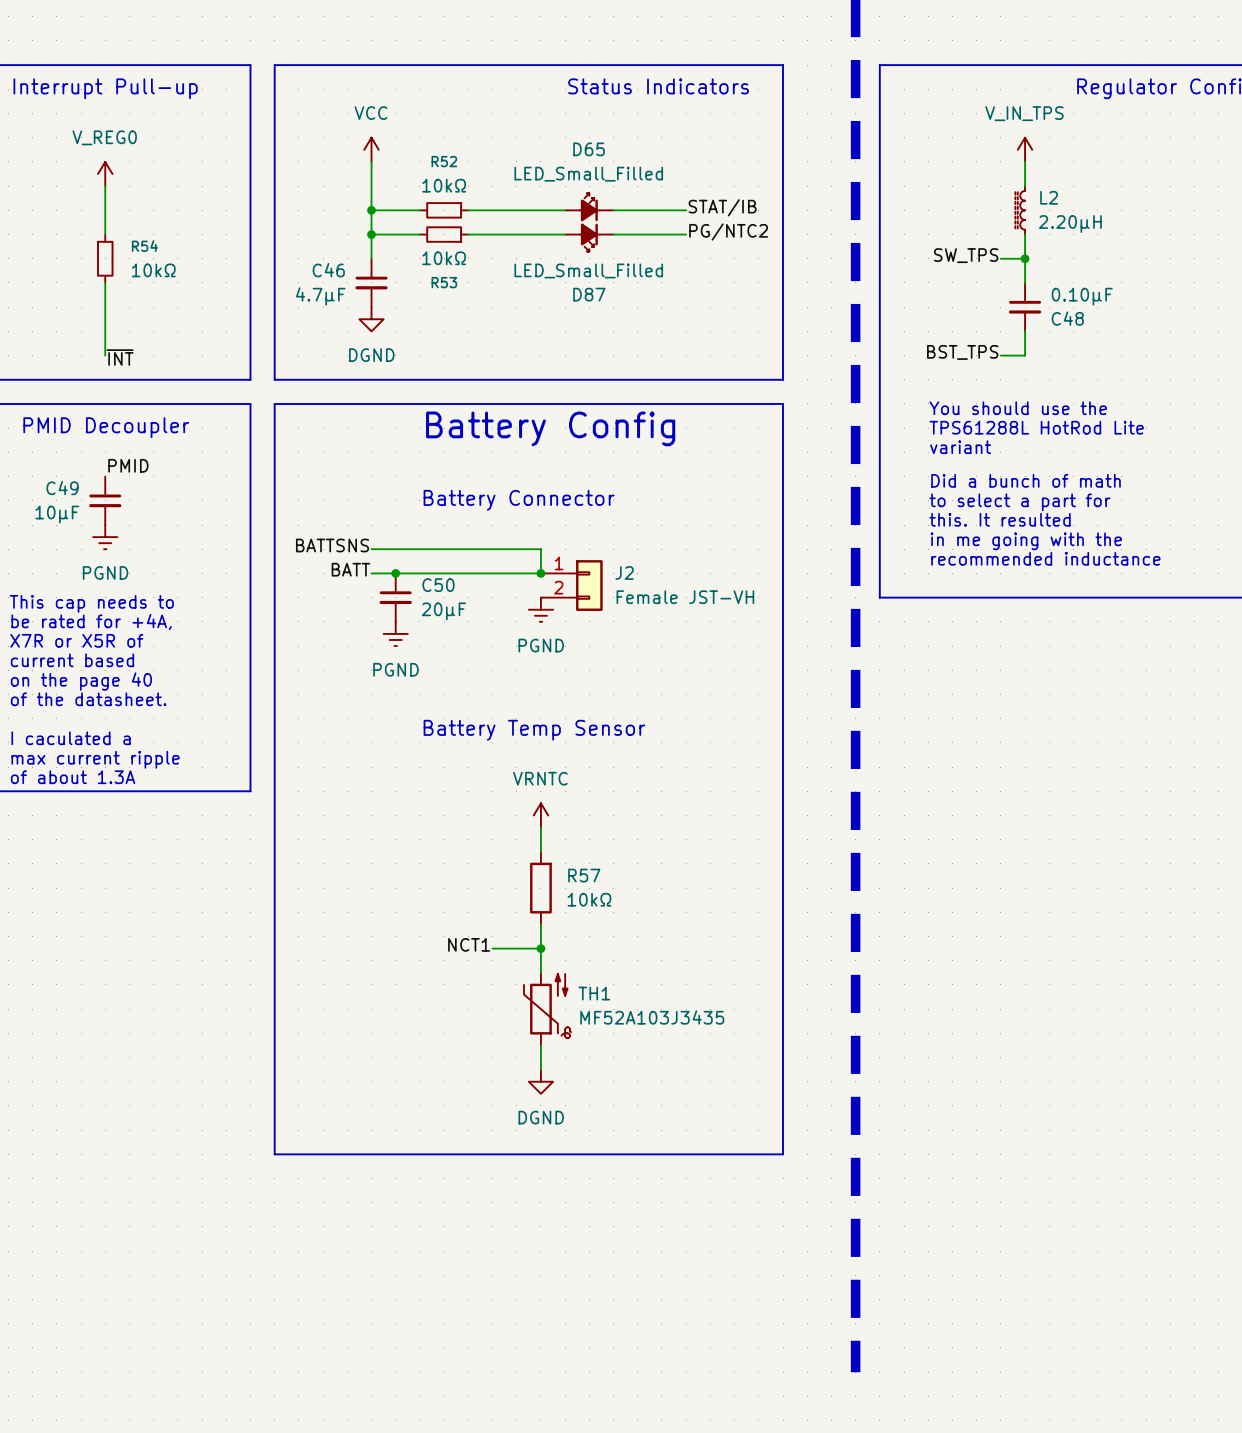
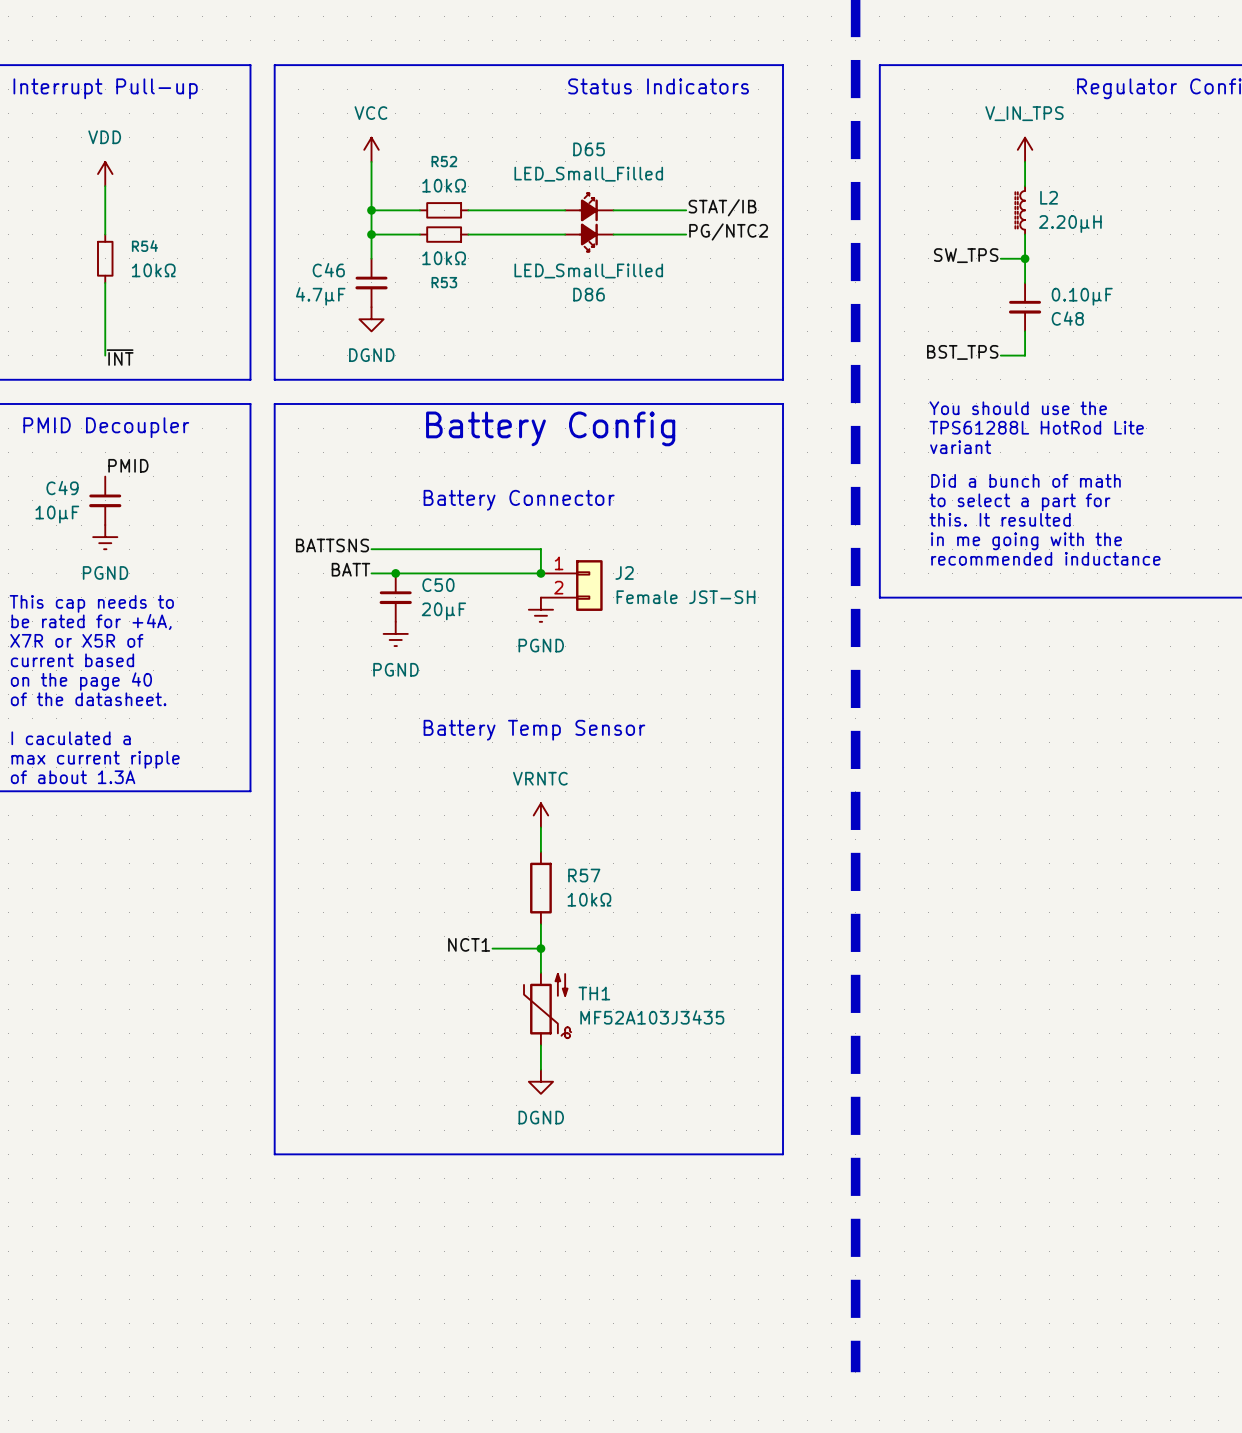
power symbol: V_REG0 (105, 174) -> VDD (105, 174)
D87 name: D87 (589, 294) -> D86 (589, 294)
J2 value: Female JST-VH (685, 597) -> Female JST-SH (685, 597)

